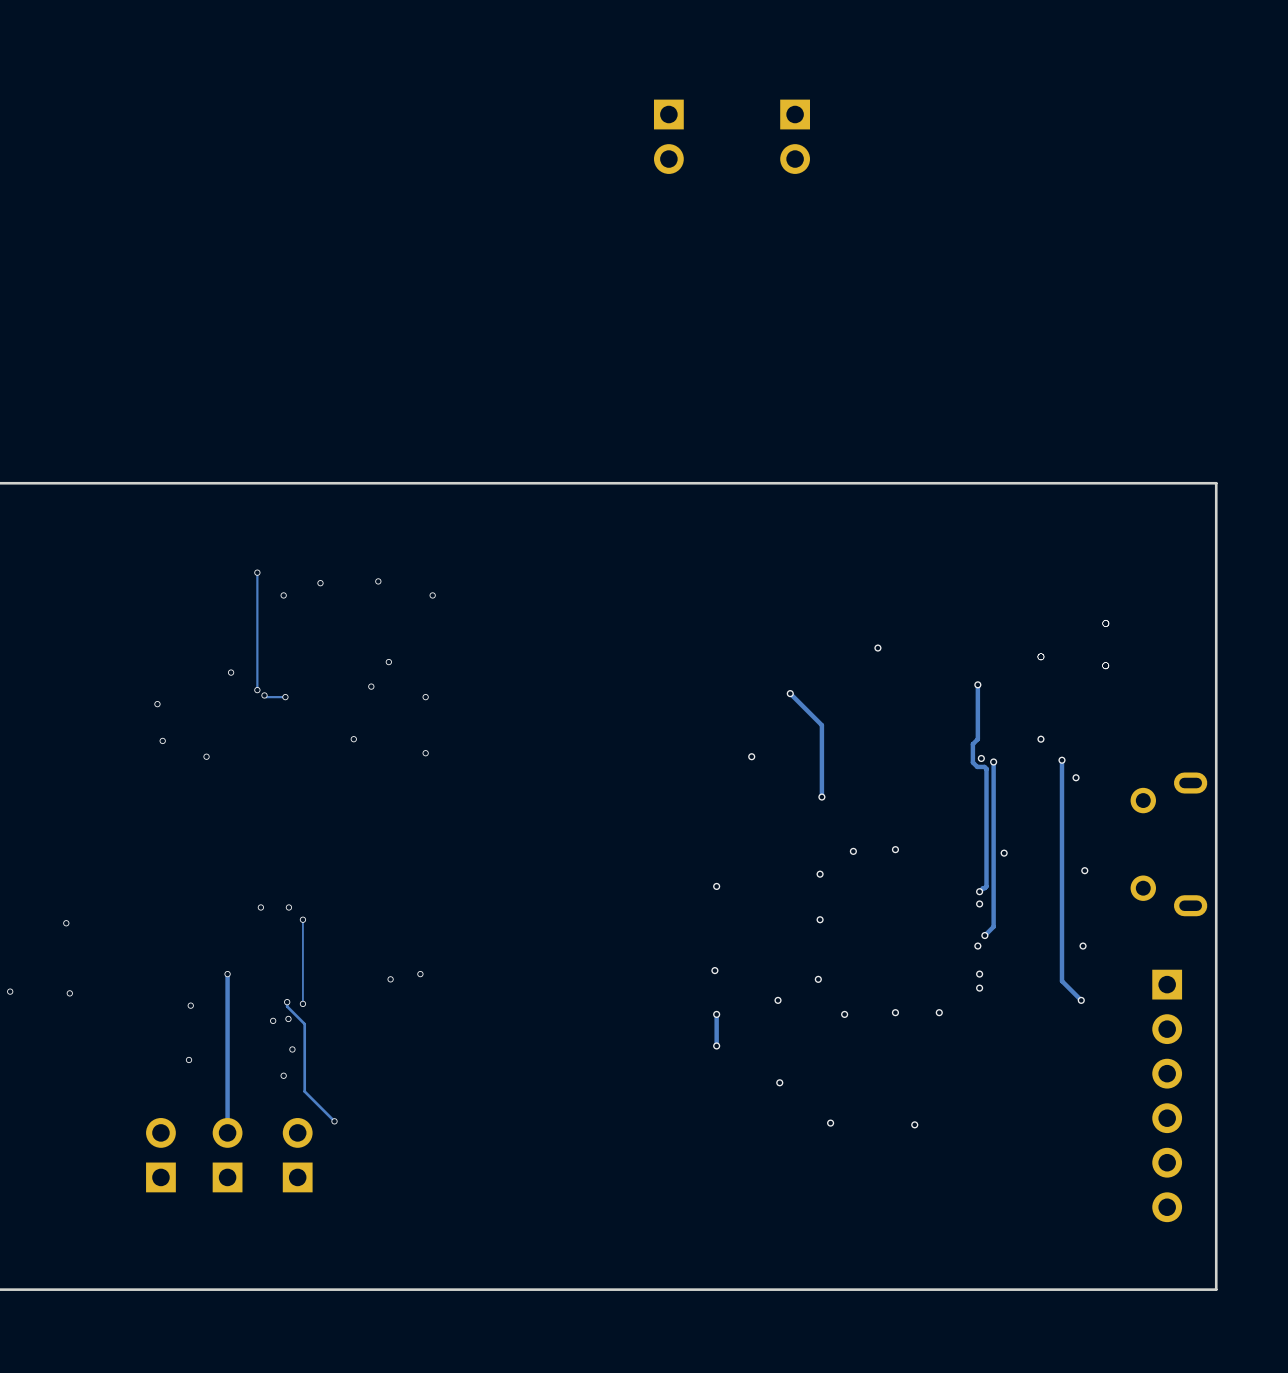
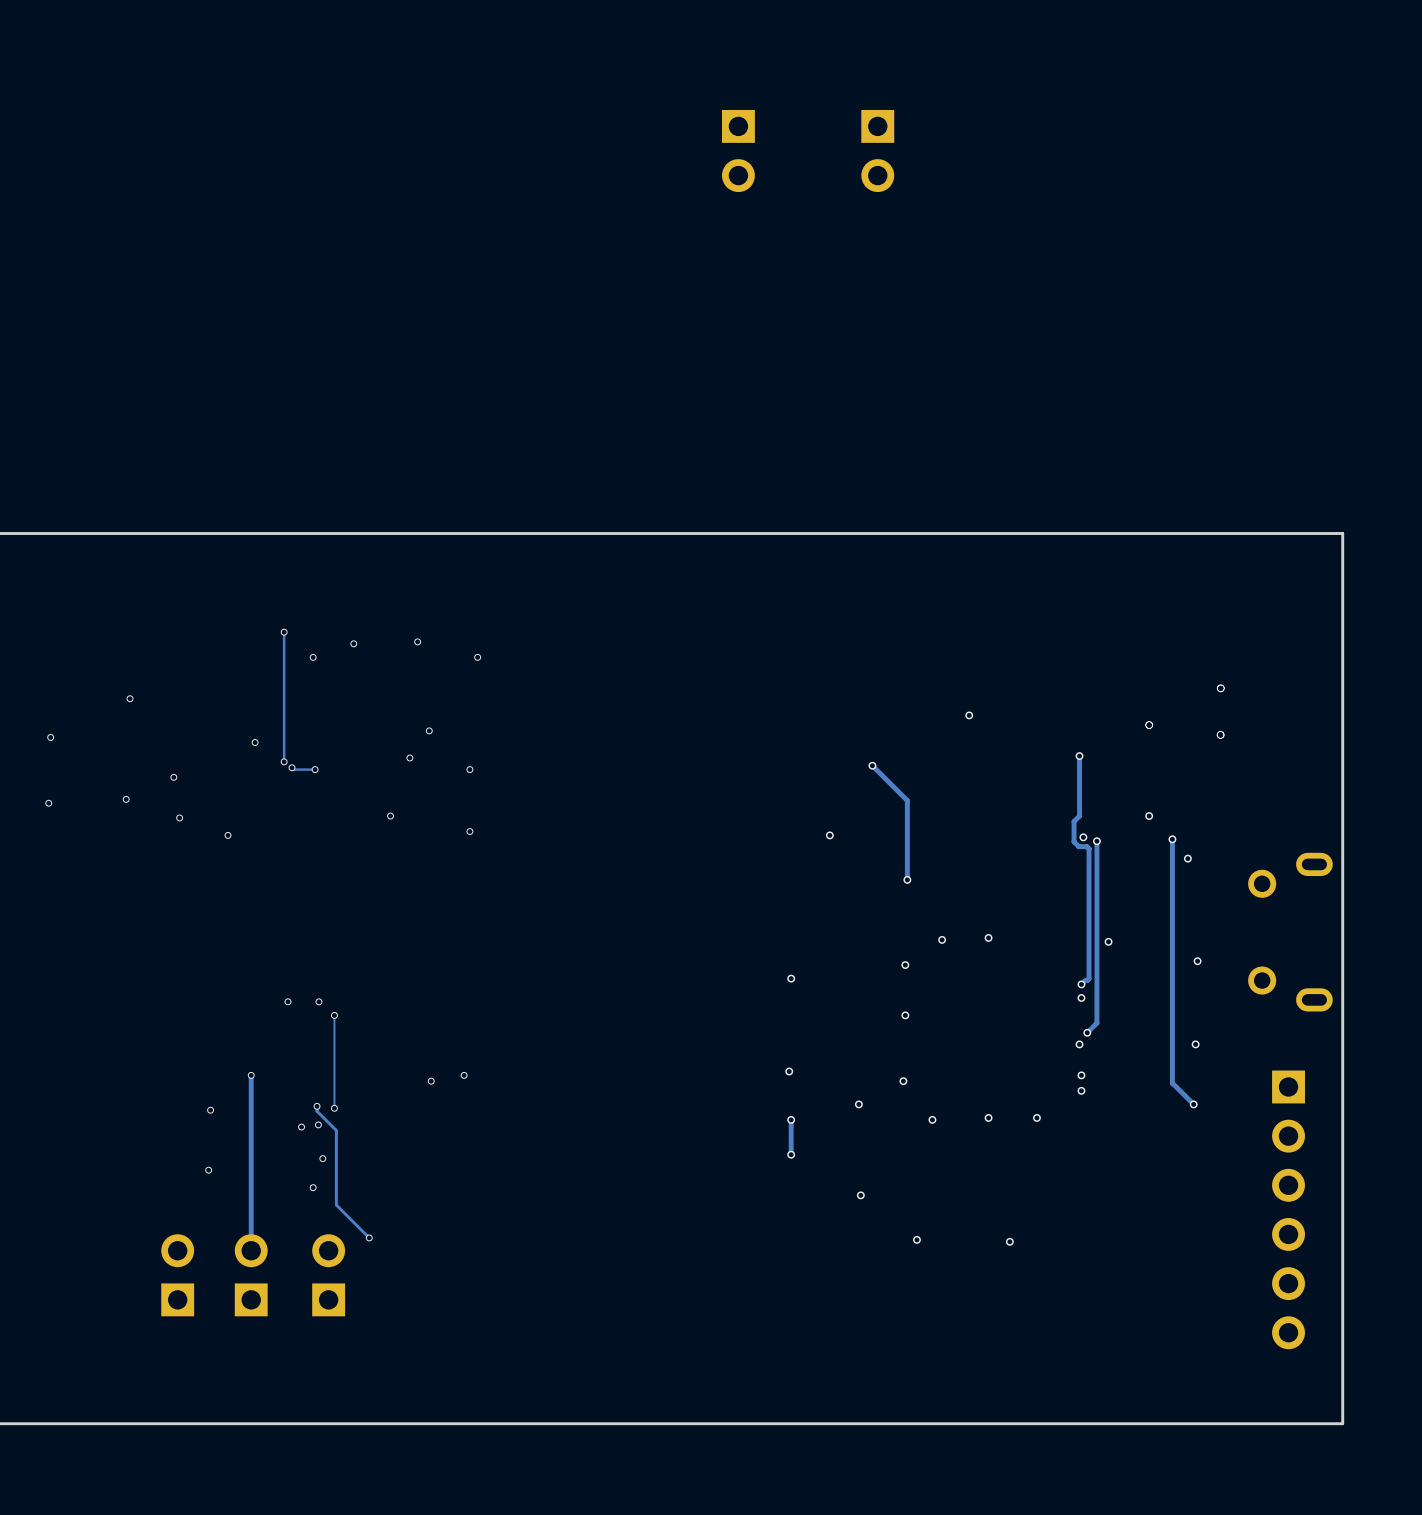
via: none -> (130, 698)
via: none -> (50, 737)
via: none -> (126, 799)
via: none -> (48, 803)
via: (66, 923) -> none
via: (10, 991) -> none
via: (69, 993) -> none

